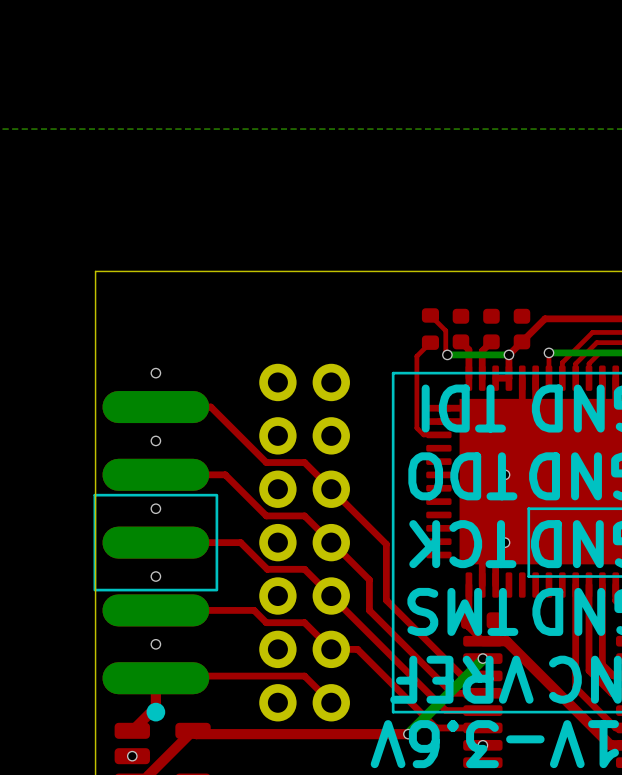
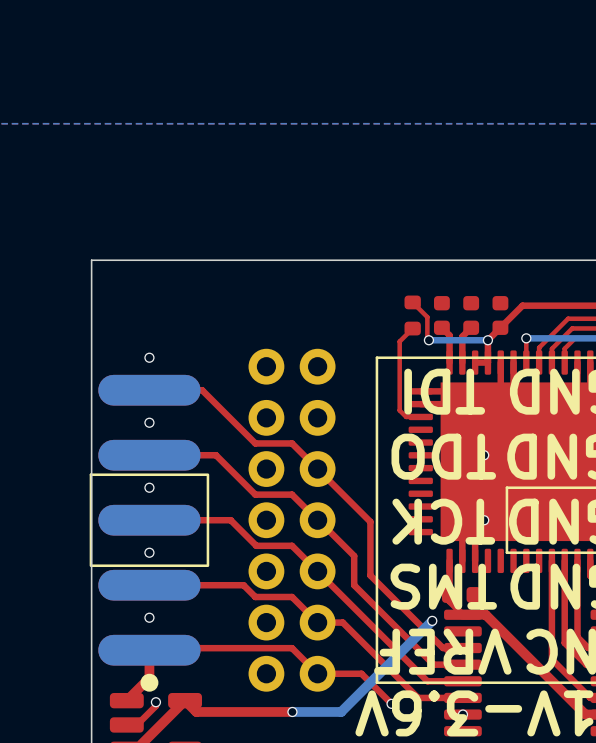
bottom track: none -> (432, 620) (341, 711) (292, 711)
bottom track: (482, 658) (408, 734) -> none
via position: (482, 658) -> (432, 620)
top track: none -> (317, 673) (361, 673) (389, 702)
top track: none -> (155, 702) (155, 705) (136, 724)
top track: (408, 734) (196, 734) -> (292, 711) (196, 711) (188, 703)
via: none -> (292, 711)
via position: (132, 756) -> (155, 702)

